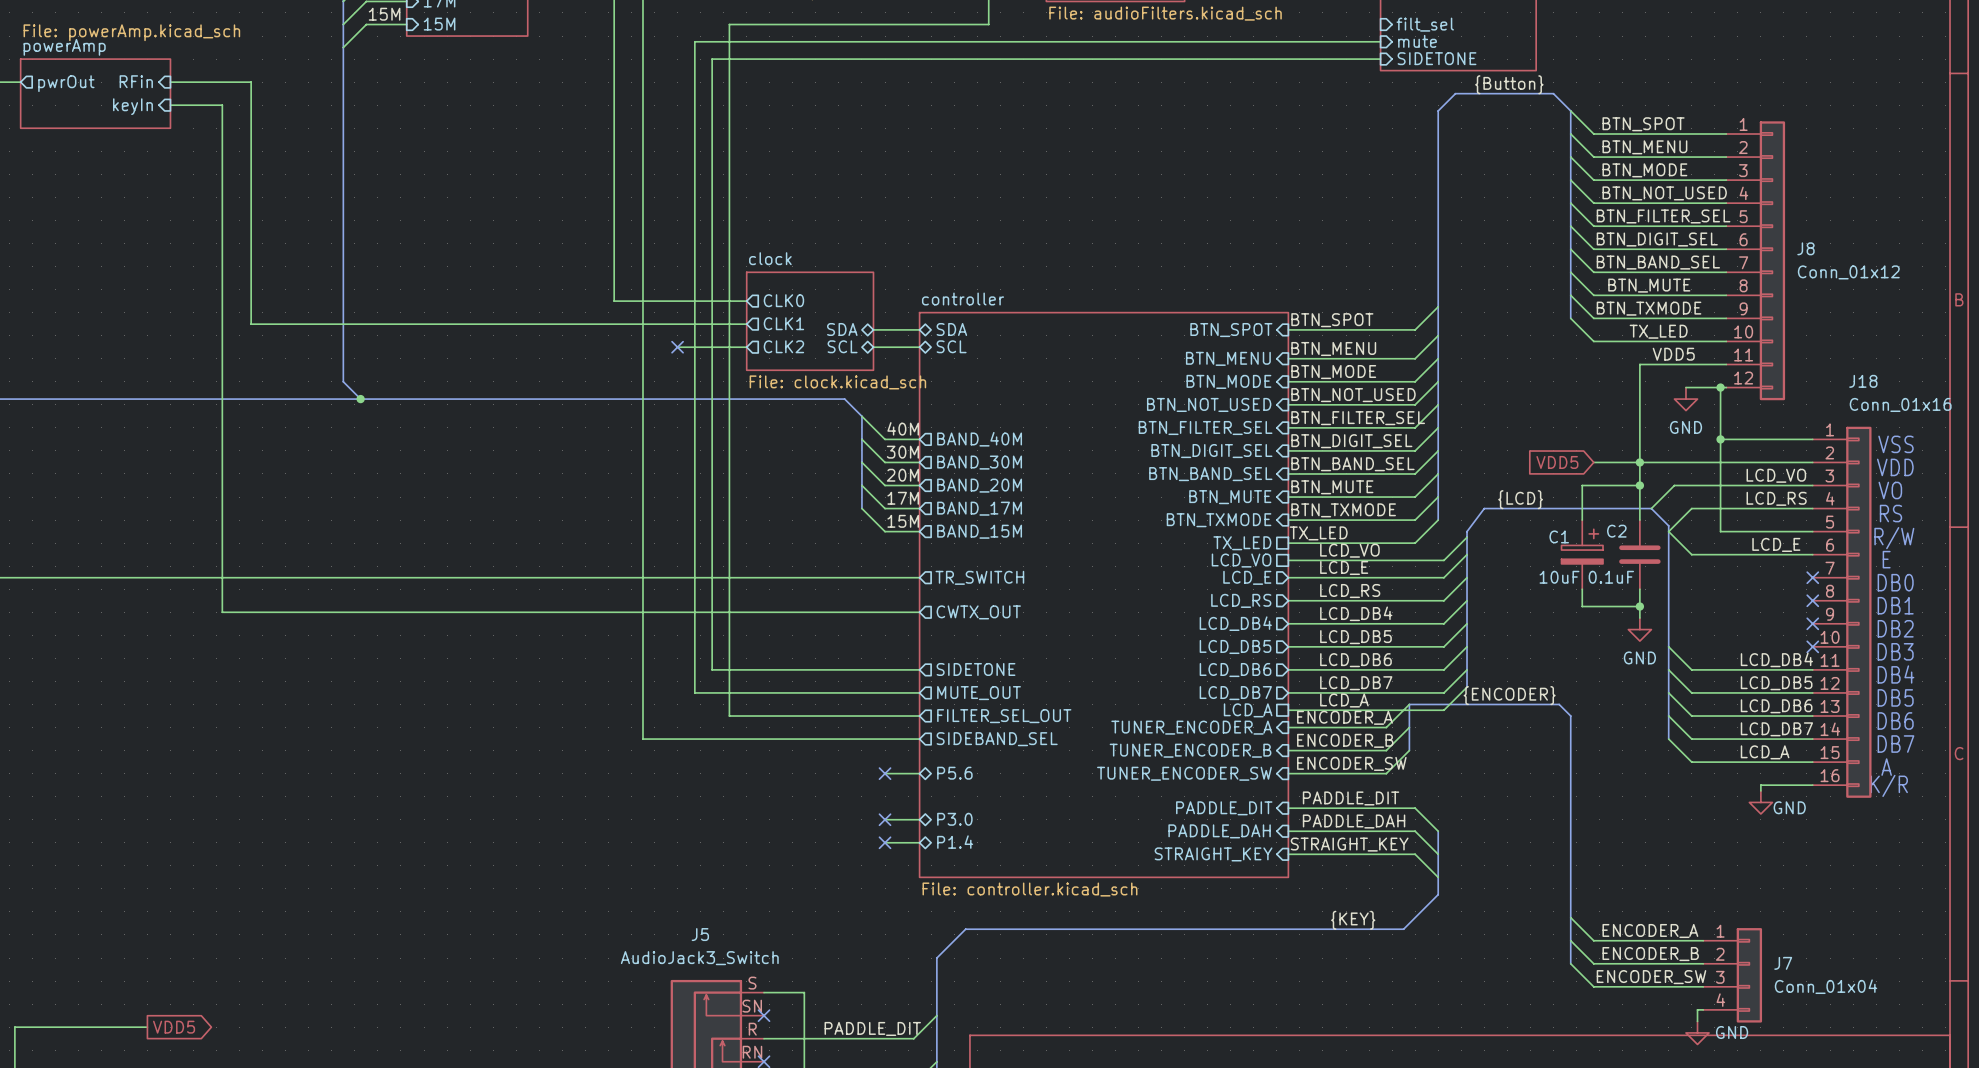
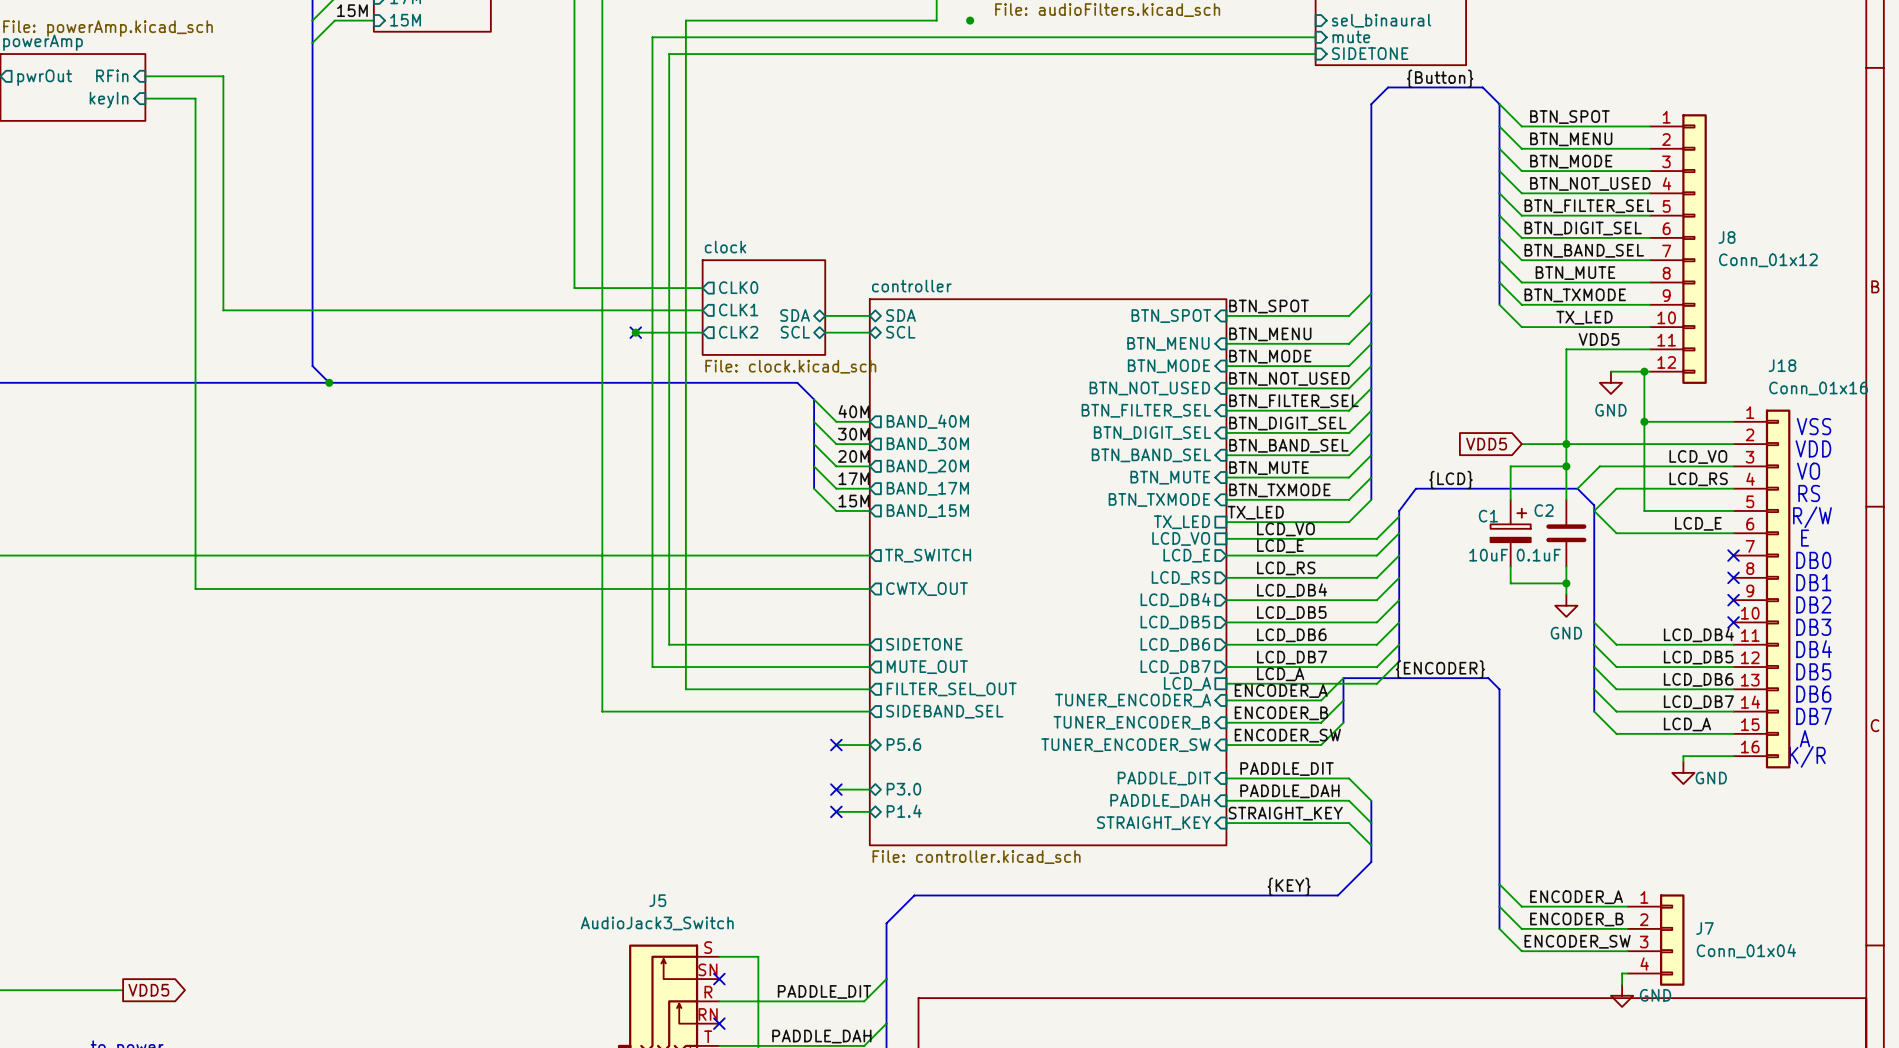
junction: none -> (970, 20)
sheet pin: filt_sel (1425, 24) -> sel_binaural (1381, 20)
junction: none -> (635, 332)

